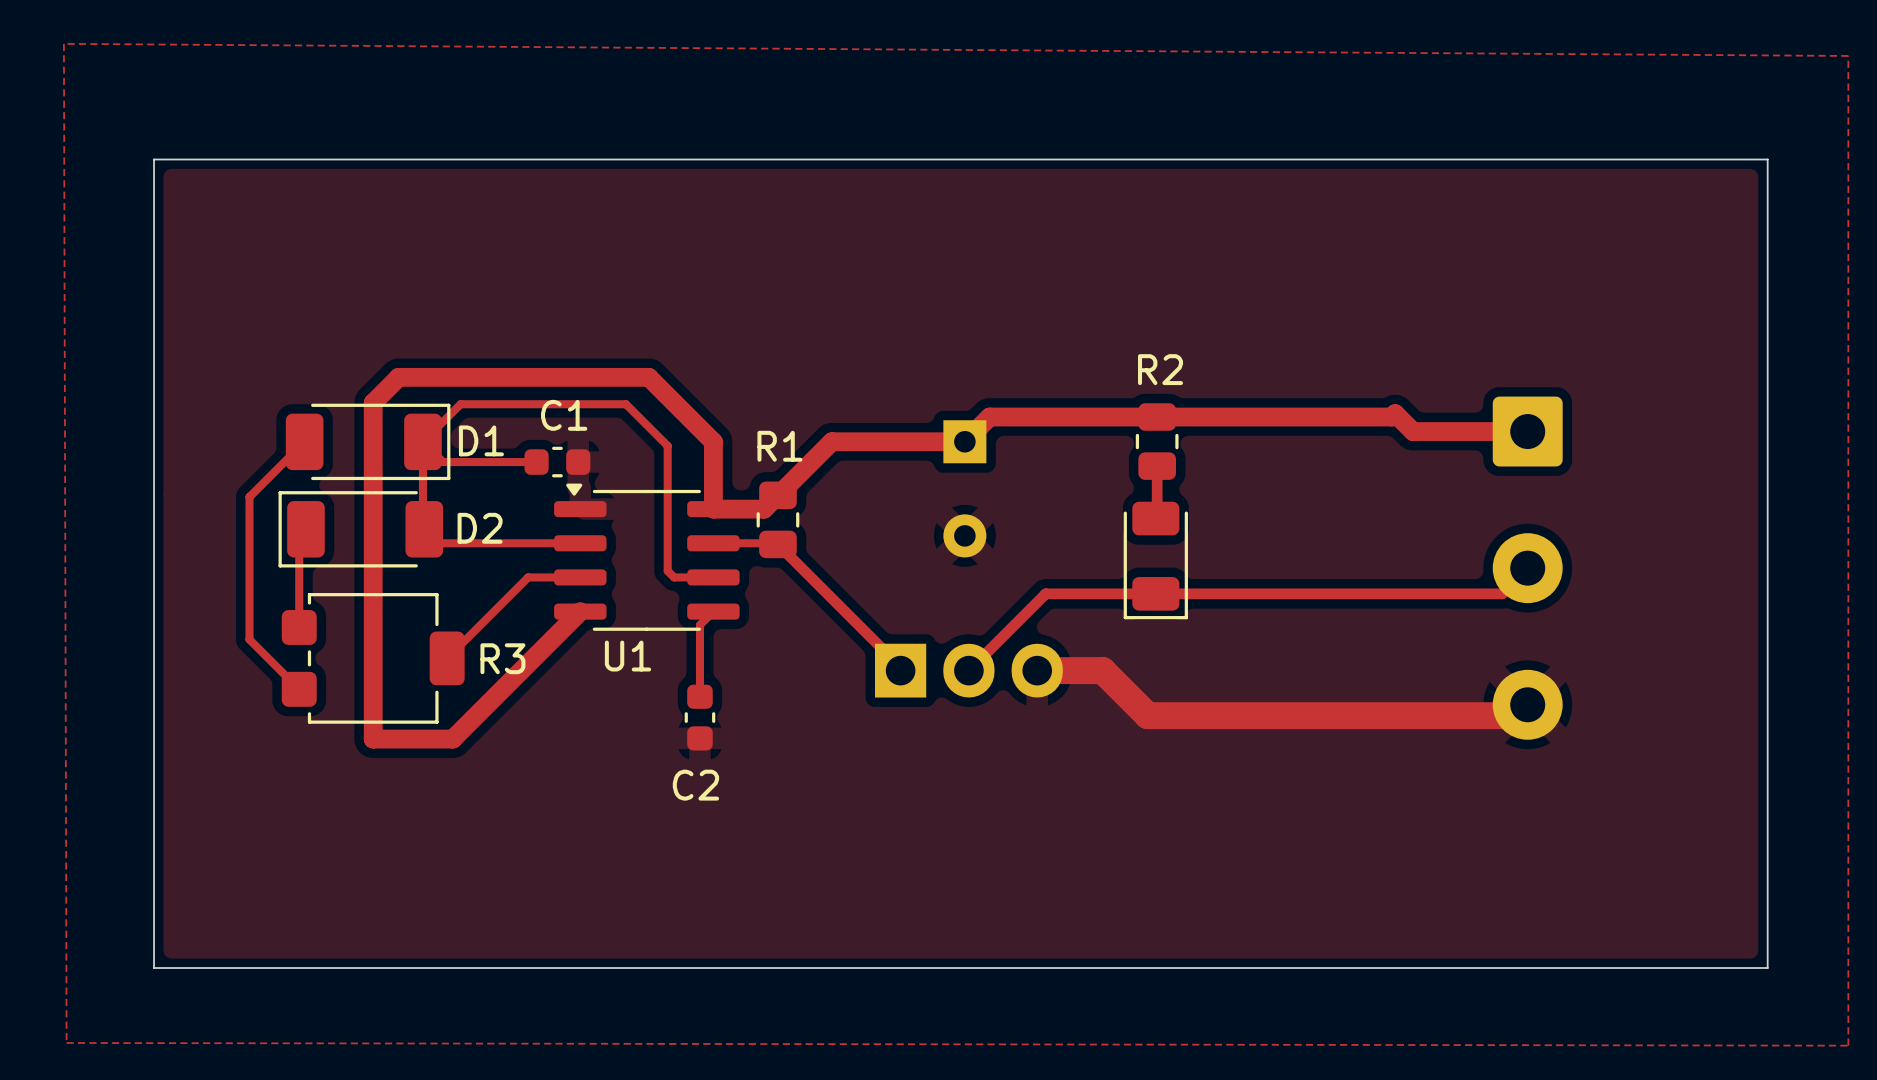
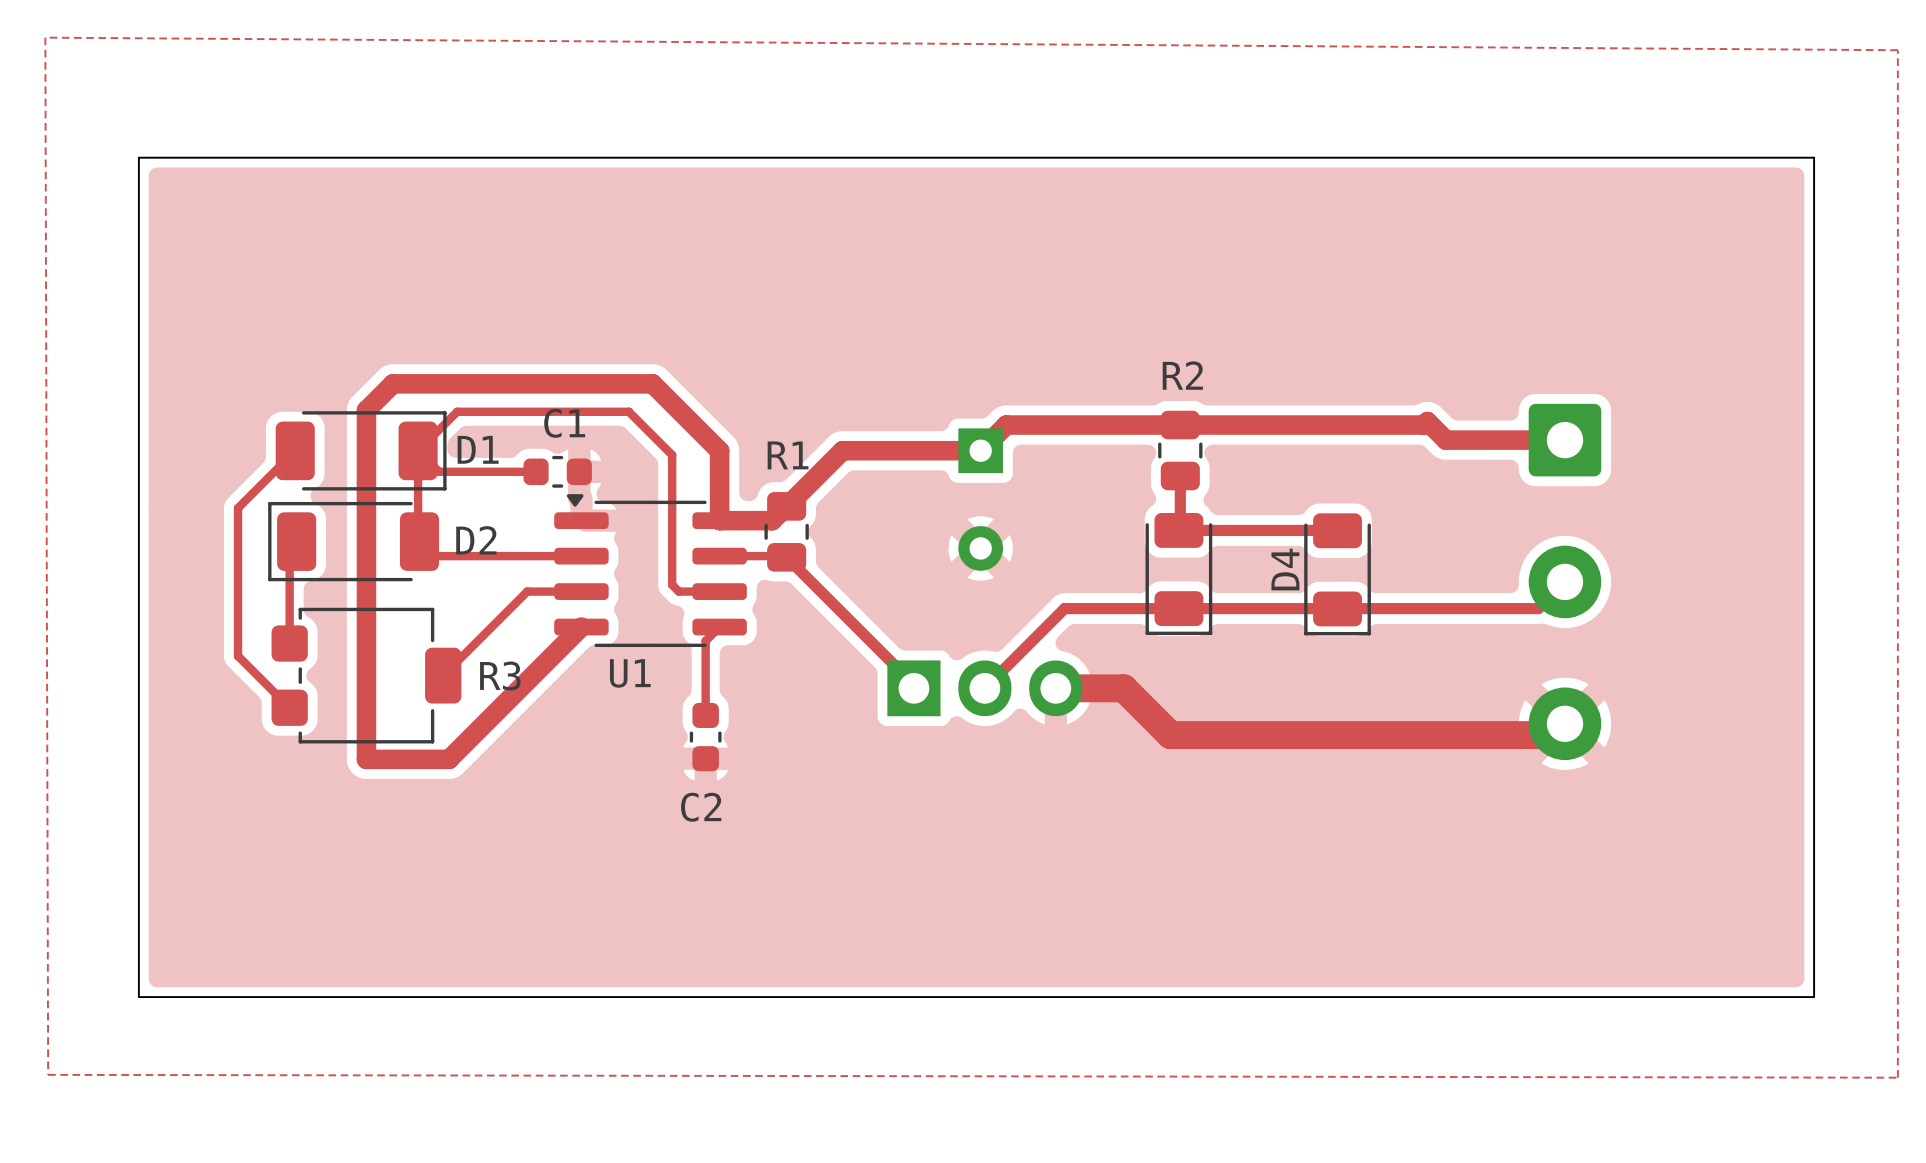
top track: none -> (1178, 530) (1337, 530)
D4: none -> (1337, 574)

